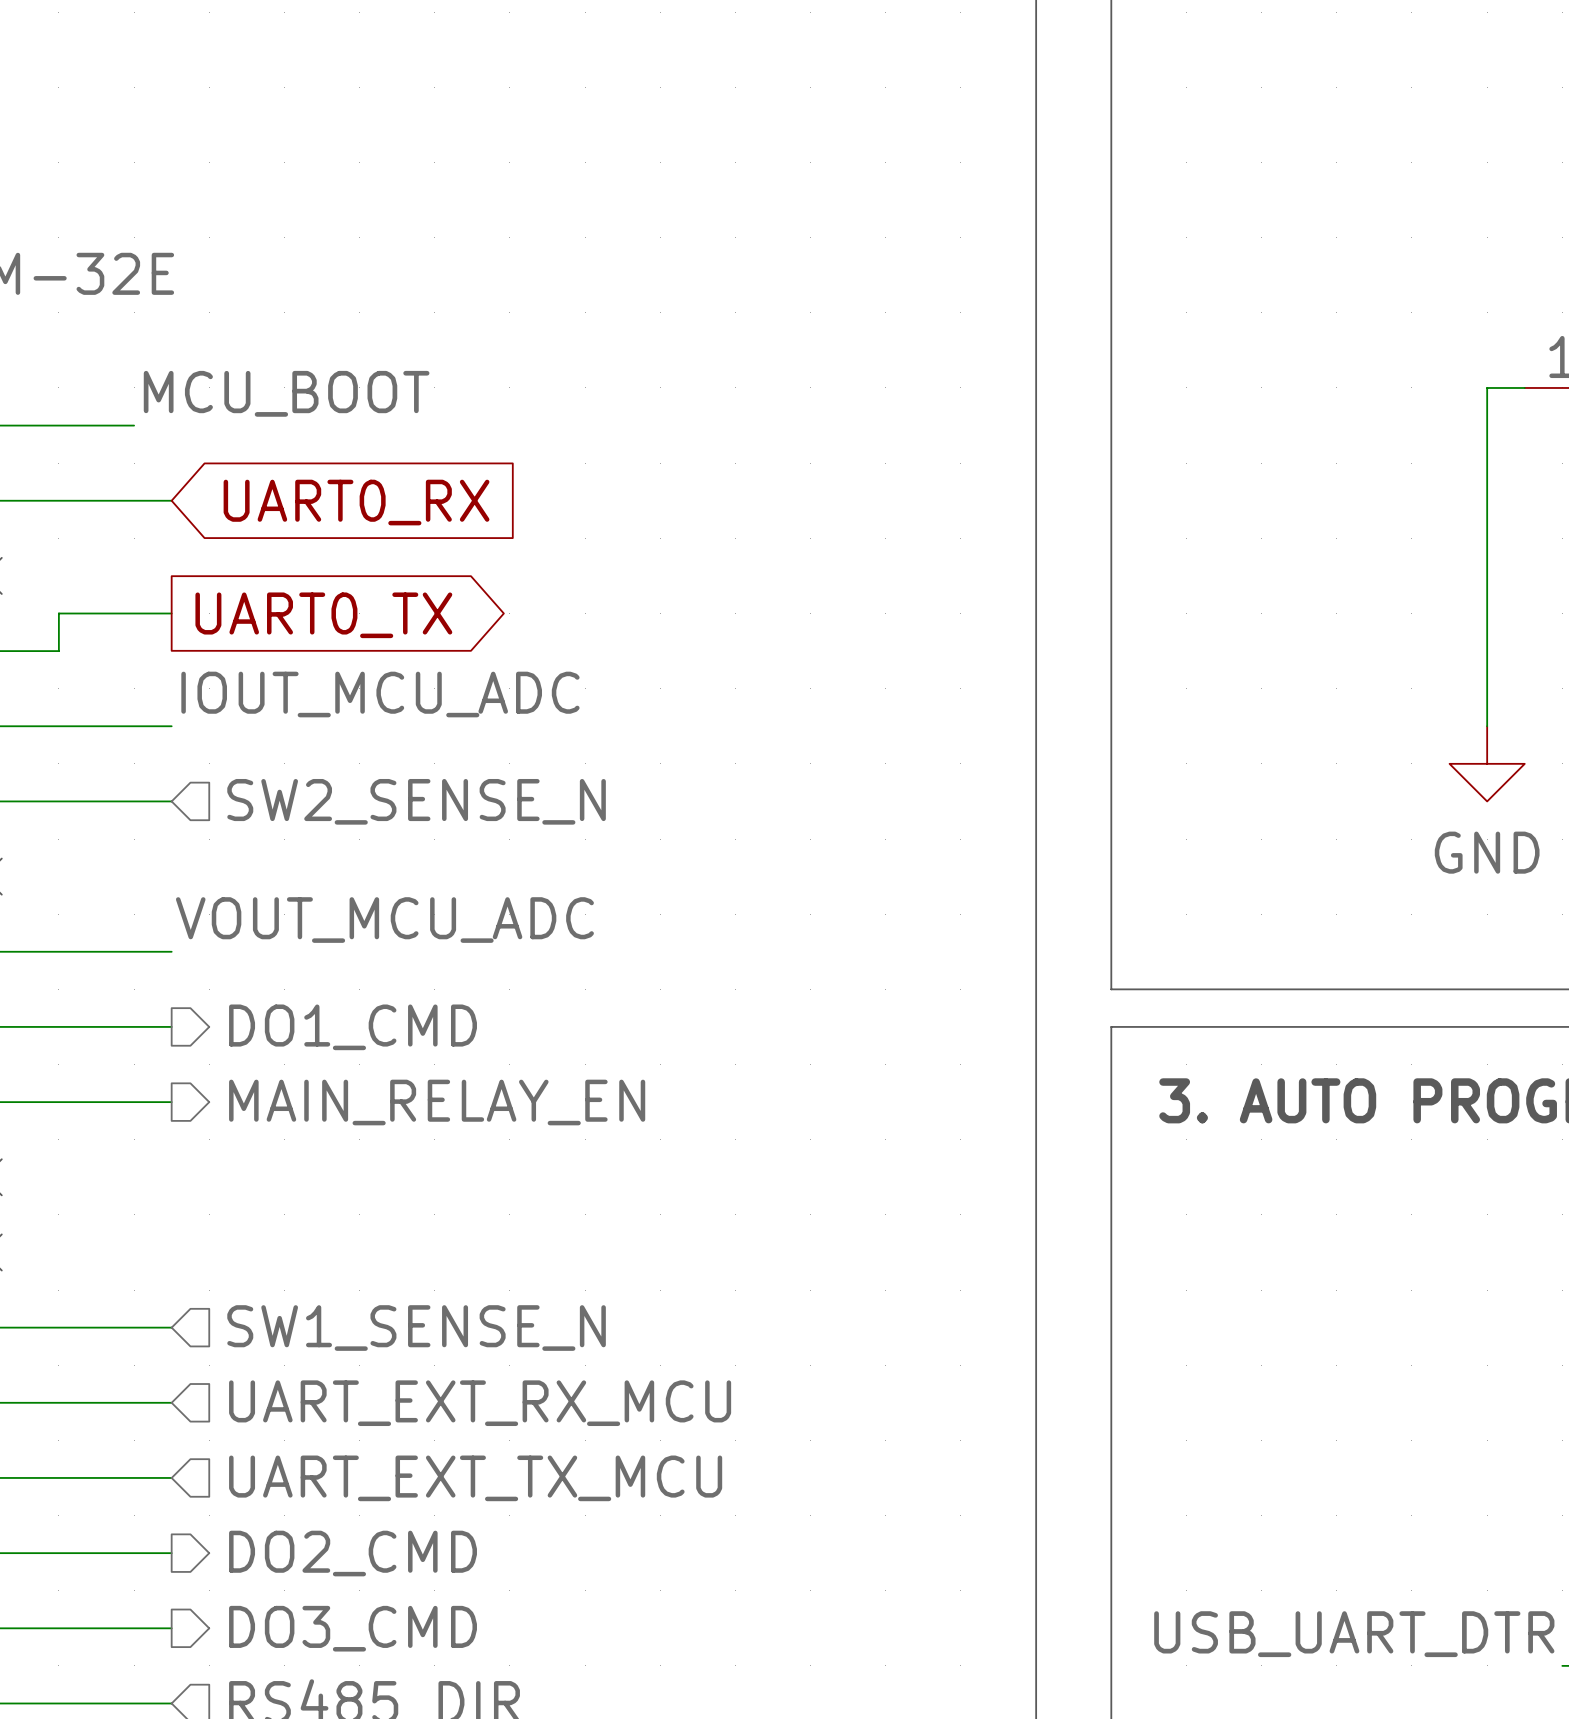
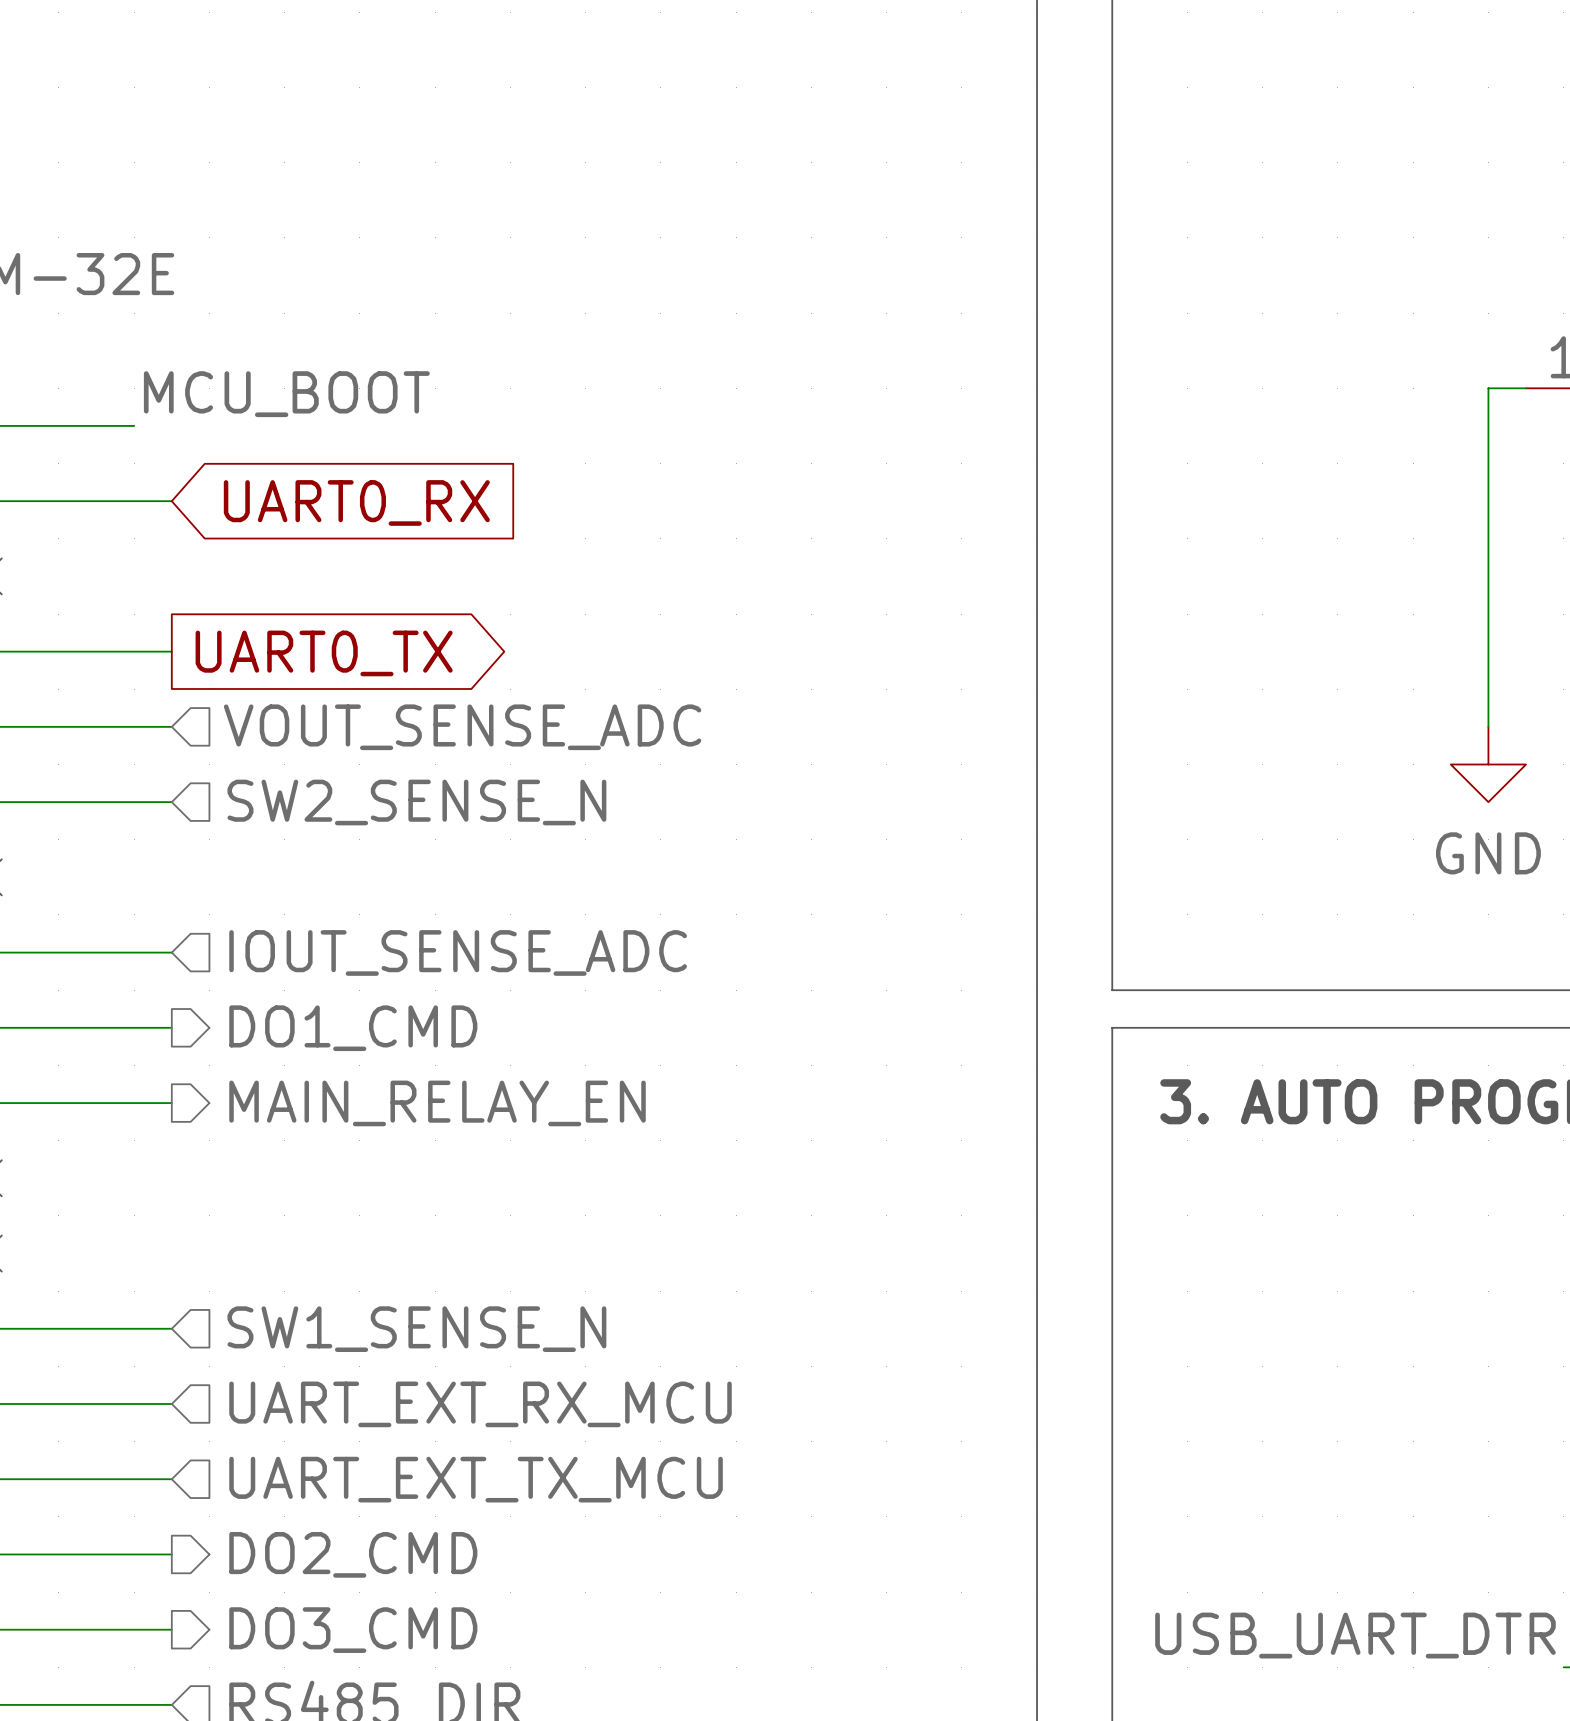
wire: (171, 613) (58, 613) (58, 651) -> (171, 651) (58, 651)
global label position: UART0_TX (323, 615) -> UART0_TX (324, 653)
label: IOUT_MCU_ADC (380, 694) -> none
hierarchical label: none -> VOUT_SENSE_ADC (462, 727)
label: VOUT_MCU_ADC (384, 920) -> none
hierarchical label: none -> IOUT_SENSE_ADC (458, 952)

